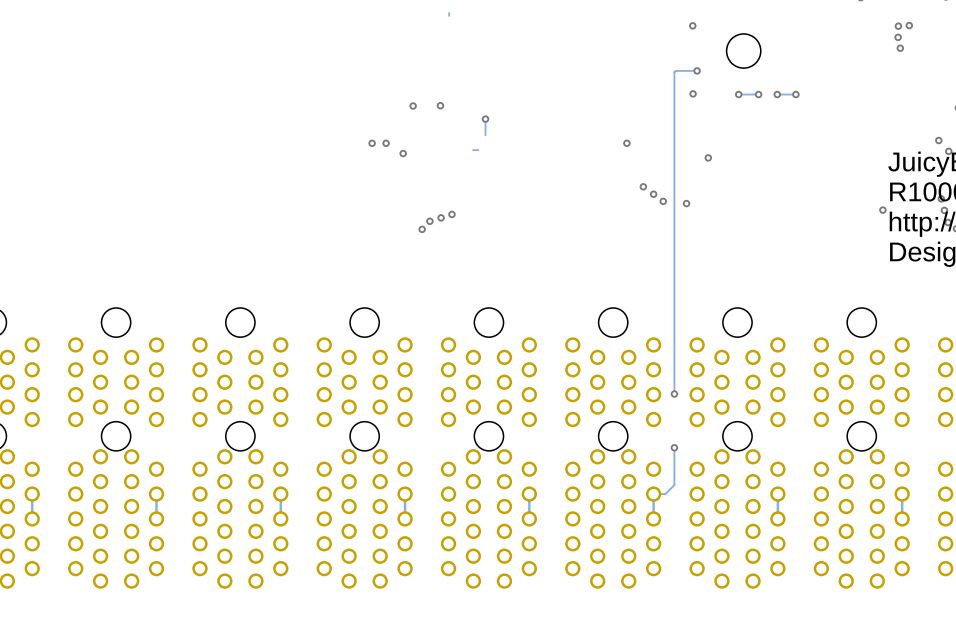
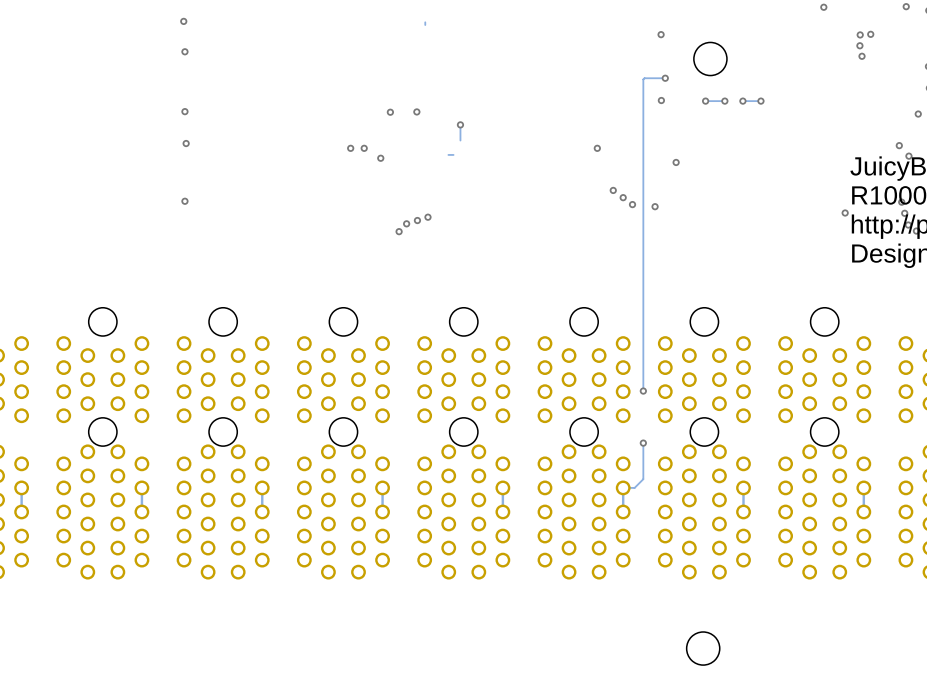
via: none -> (183, 21)
via: none -> (184, 51)
via: none -> (184, 111)
via: none -> (186, 143)
via: none -> (184, 201)

